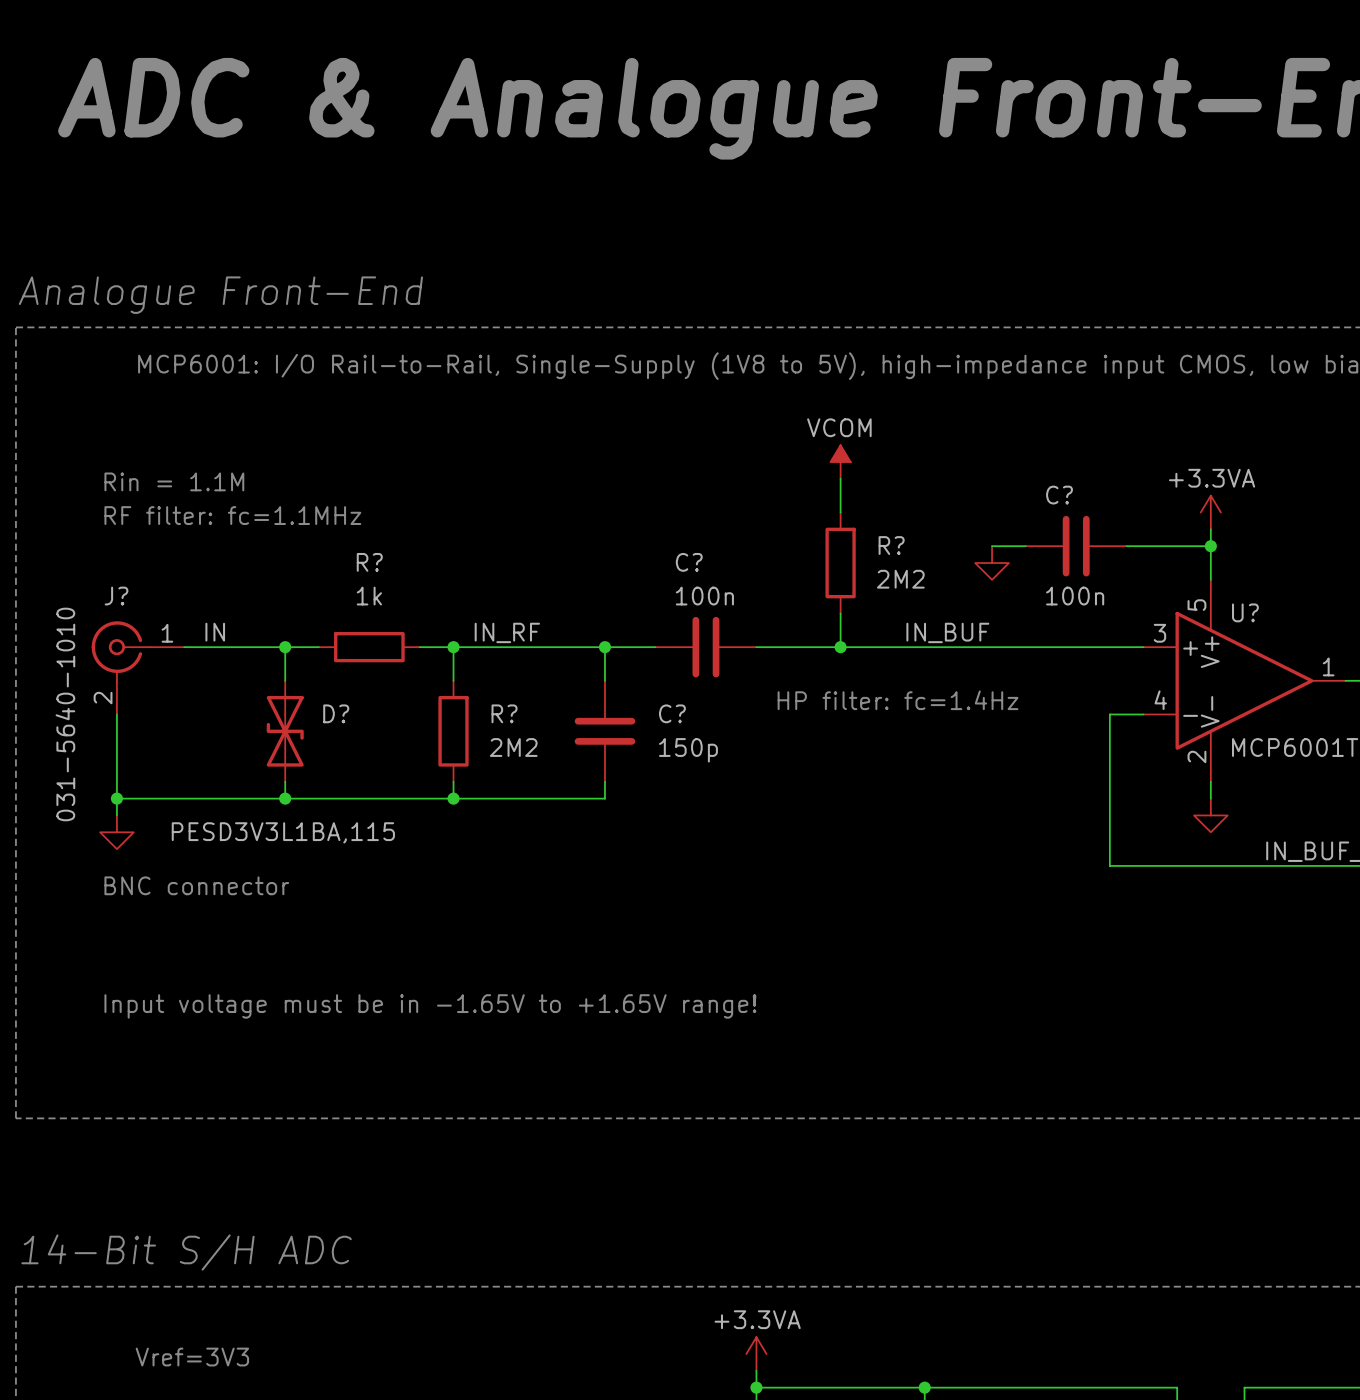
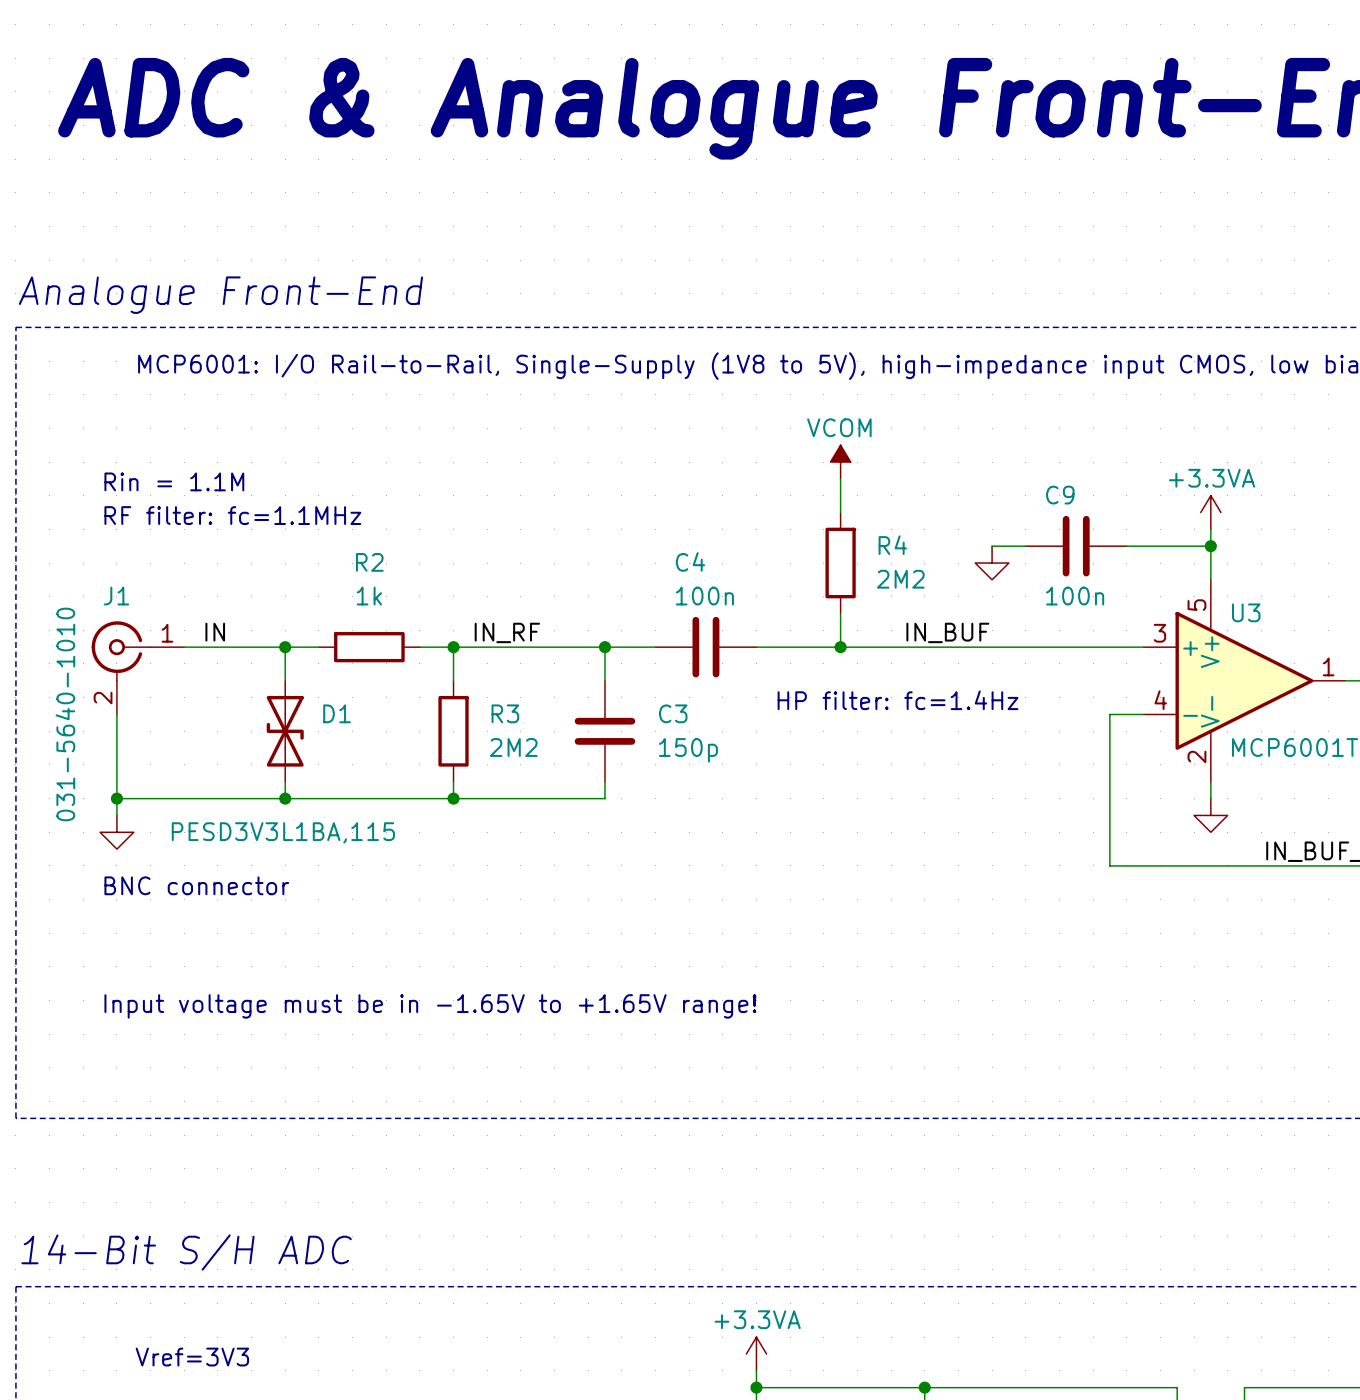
C? name: C? (1059, 495) -> C9 (1060, 495)
R? name: R? (891, 545) -> R4 (892, 545)
R? name: R? (369, 562) -> R2 (369, 562)
C? name: C? (689, 562) -> C4 (690, 561)
J? name: J? (116, 596) -> J1 (116, 596)
U? name: U? (1245, 612) -> U3 (1246, 612)
D? name: D? (336, 713) -> D1 (337, 713)
R? name: R? (504, 713) -> R3 (505, 713)
C? name: C? (672, 713) -> C3 (673, 713)

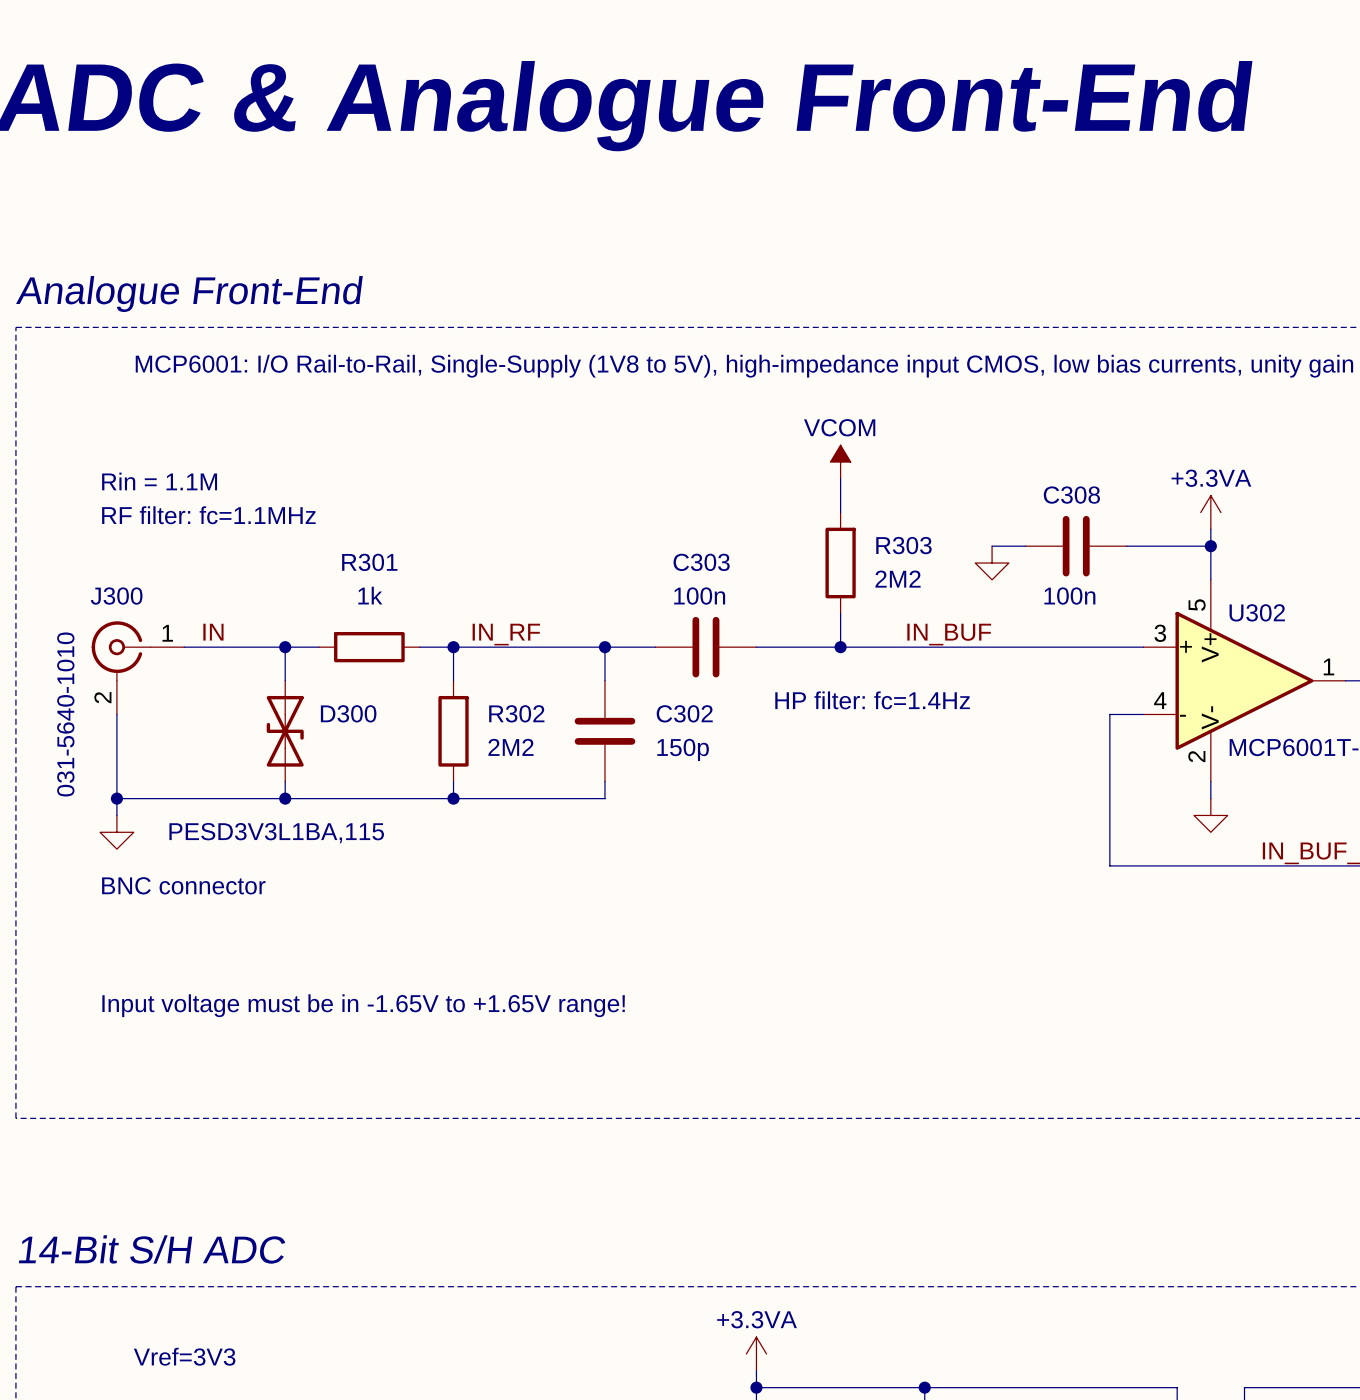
C9 name: C9 (1060, 495) -> C308 (1071, 495)
R4 name: R4 (892, 545) -> R303 (903, 545)
C4 name: C4 (690, 561) -> C303 (701, 562)
R2 name: R2 (369, 562) -> R301 (369, 562)
J1 name: J1 (116, 596) -> J300 (116, 596)
U3 name: U3 (1246, 612) -> U302 (1257, 612)
D1 name: D1 (337, 713) -> D300 (348, 713)
R3 name: R3 (505, 713) -> R302 (516, 713)
C3 name: C3 (673, 713) -> C302 (684, 713)

